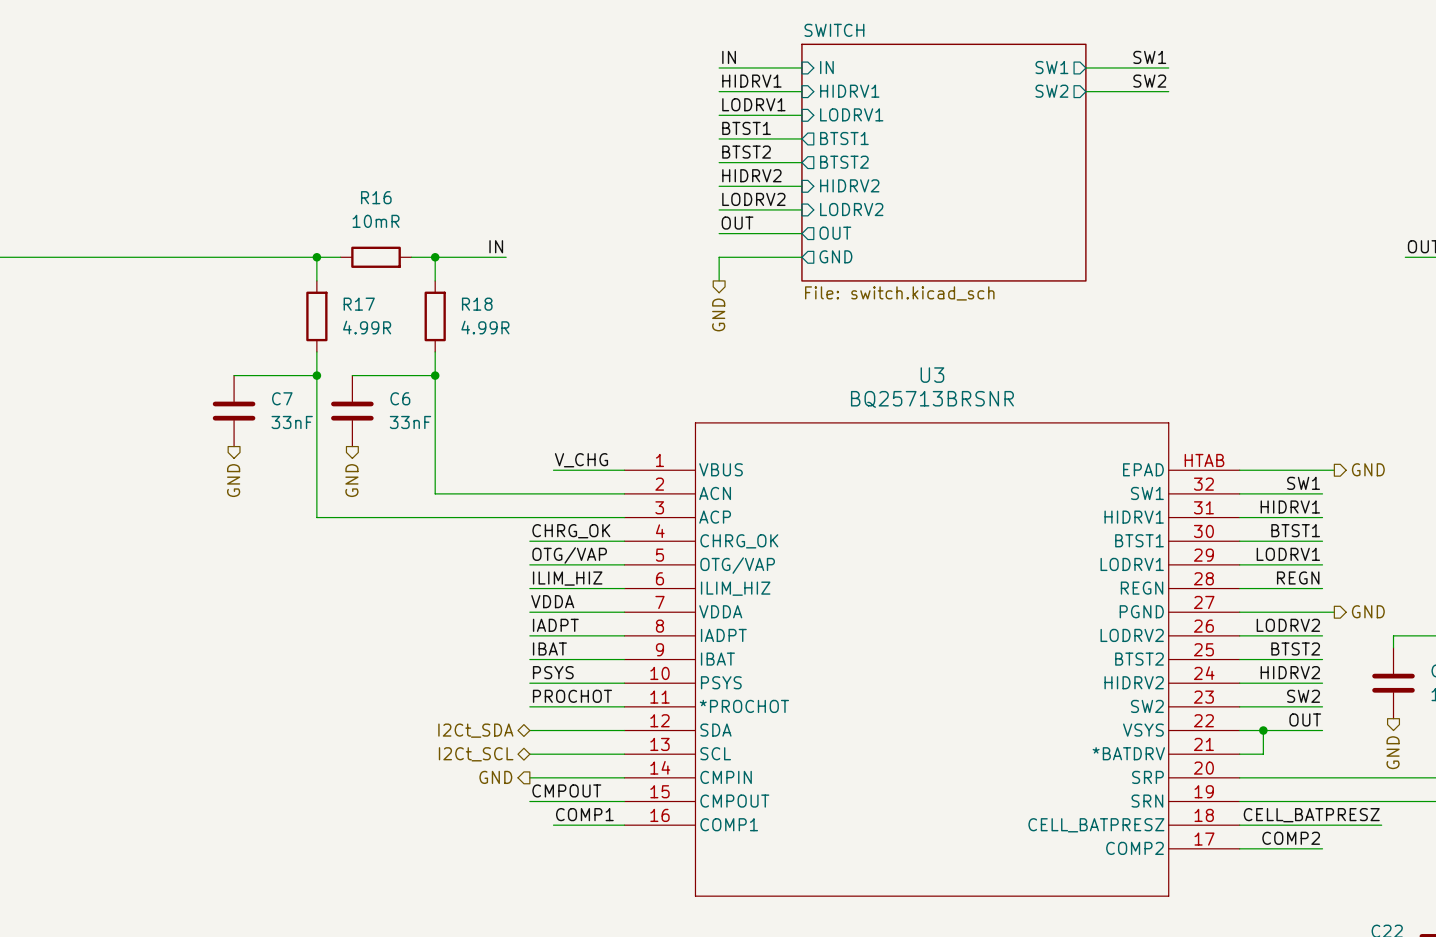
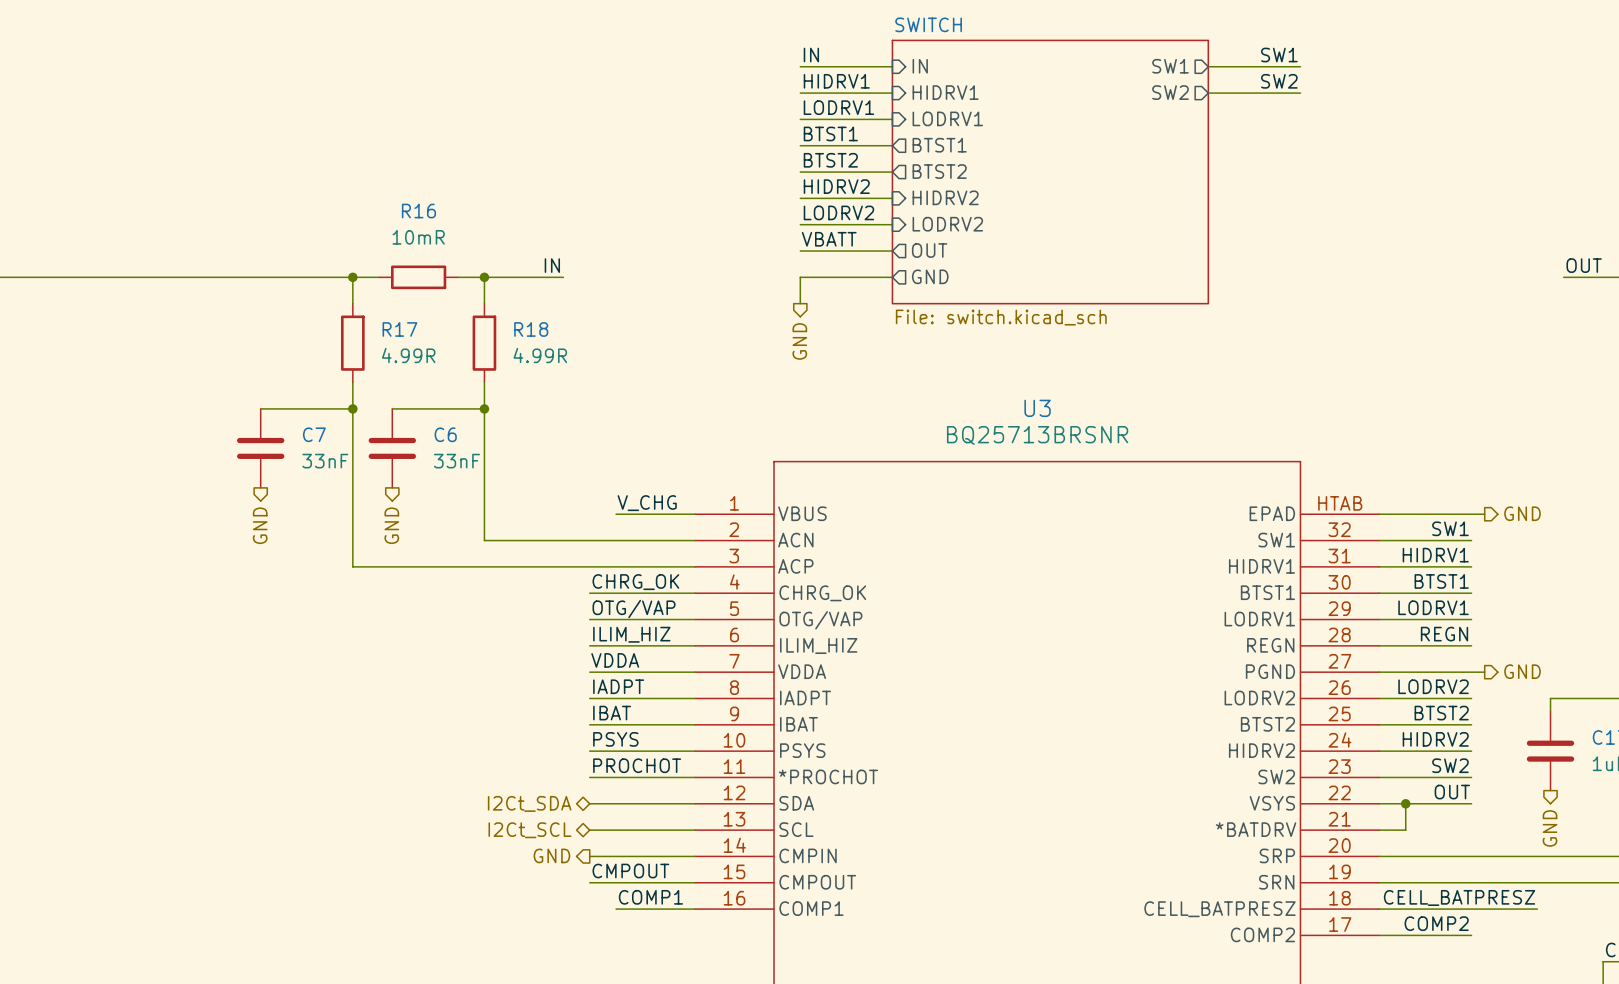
label: OUT (737, 223) -> VBATT (829, 239)

